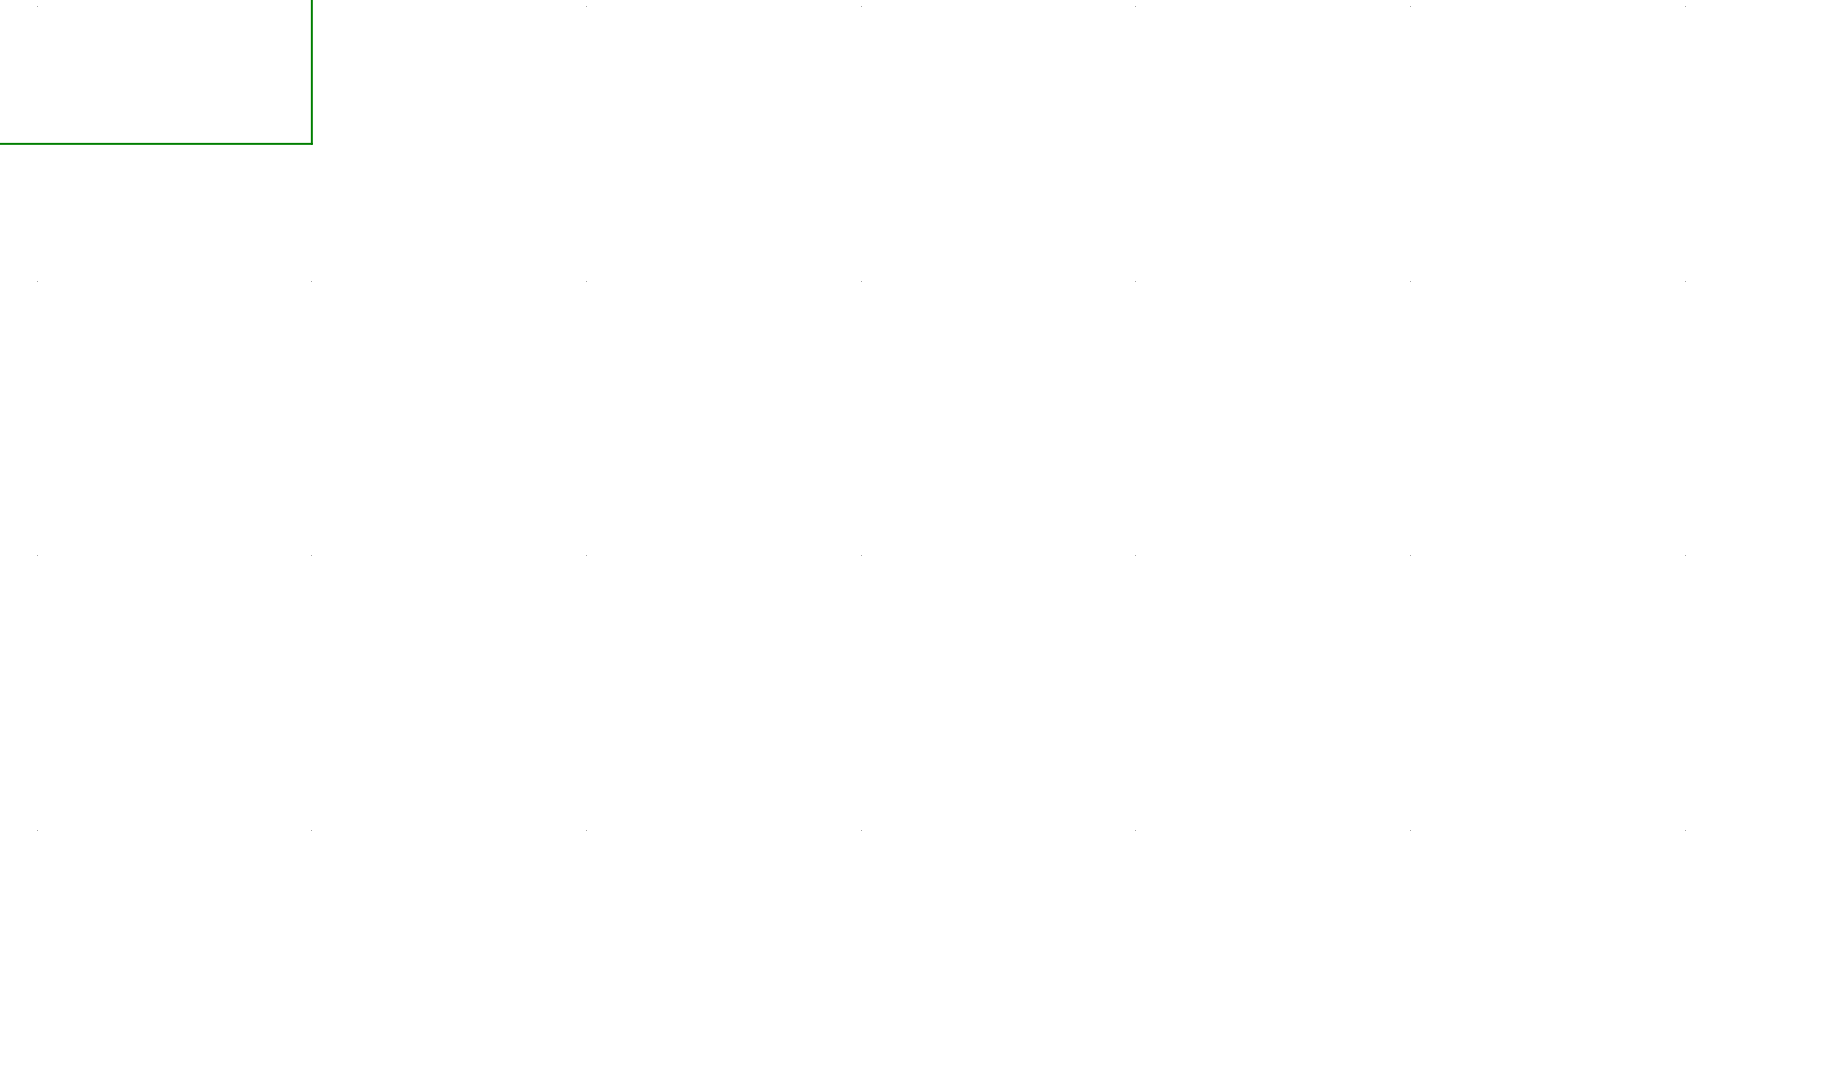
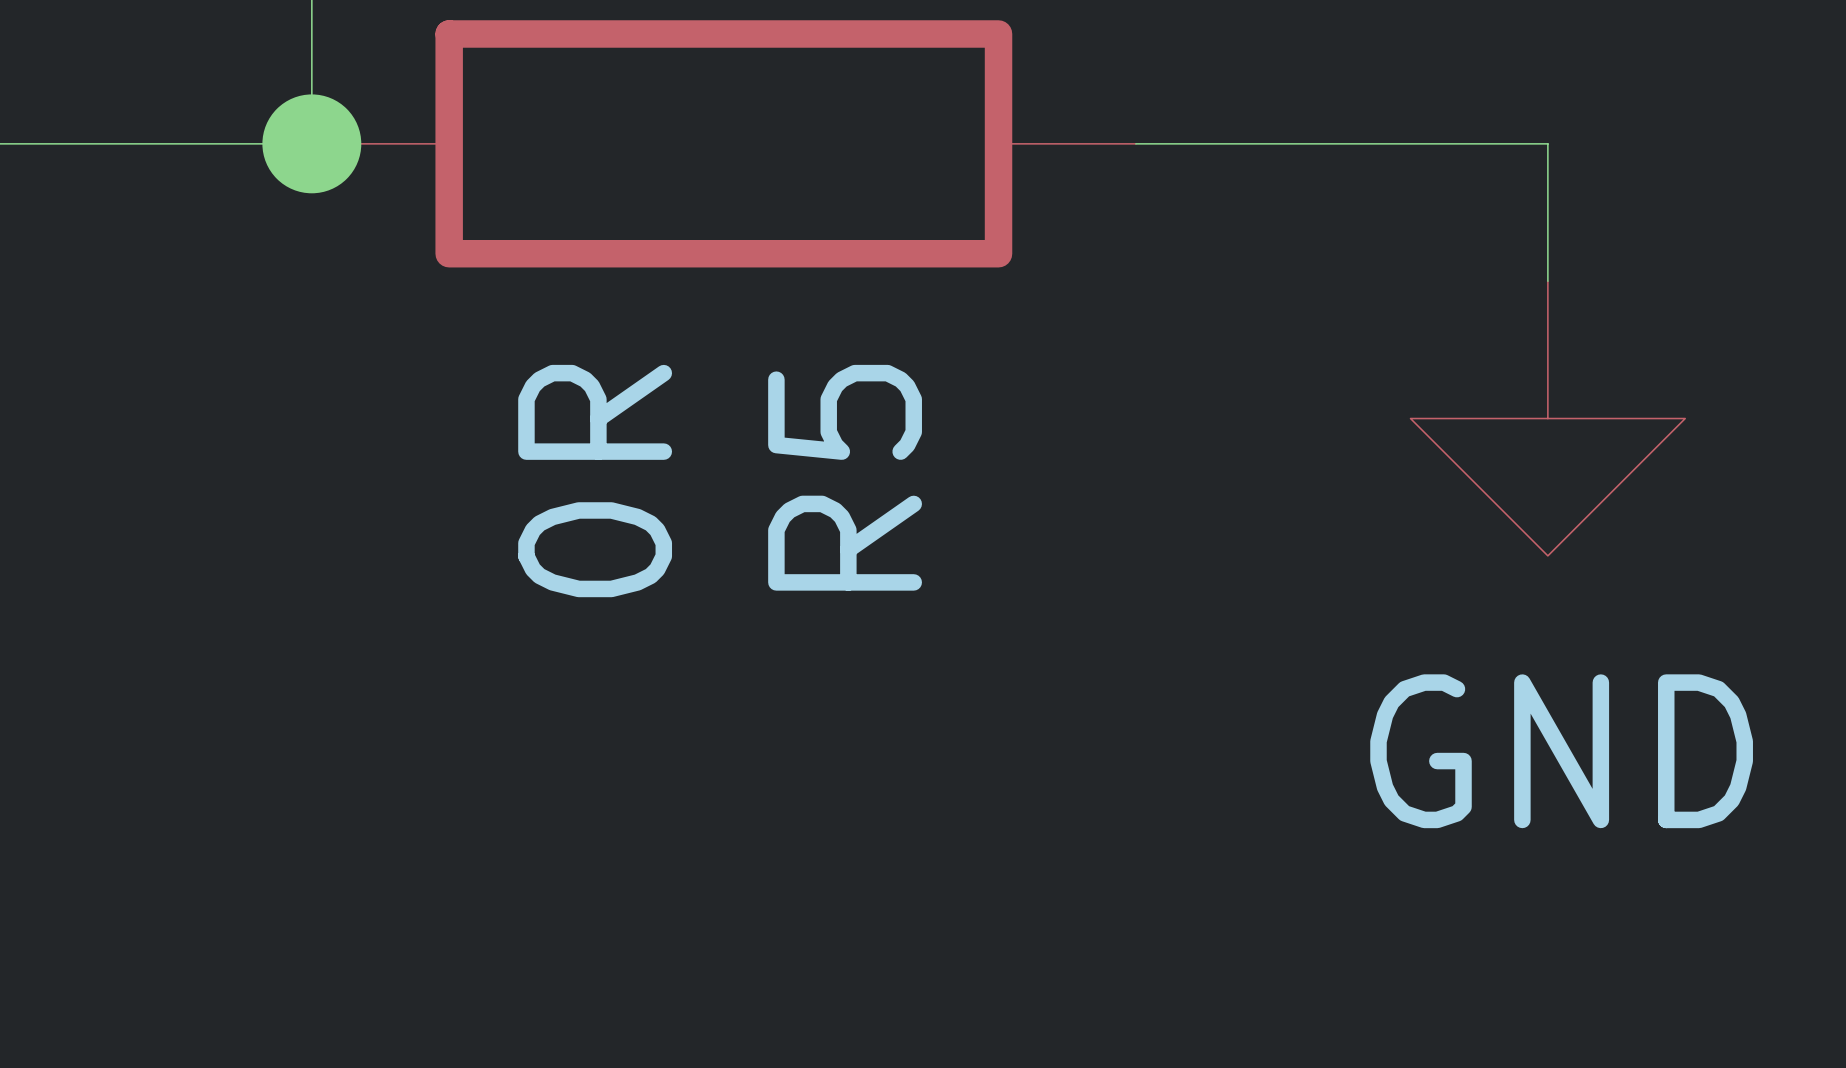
junction: none -> (311, 143)
R5: none -> 0R (723, 143)
wire: none -> (1135, 143) (1547, 143) (1547, 281)
power symbol: none -> GND (1547, 418)

